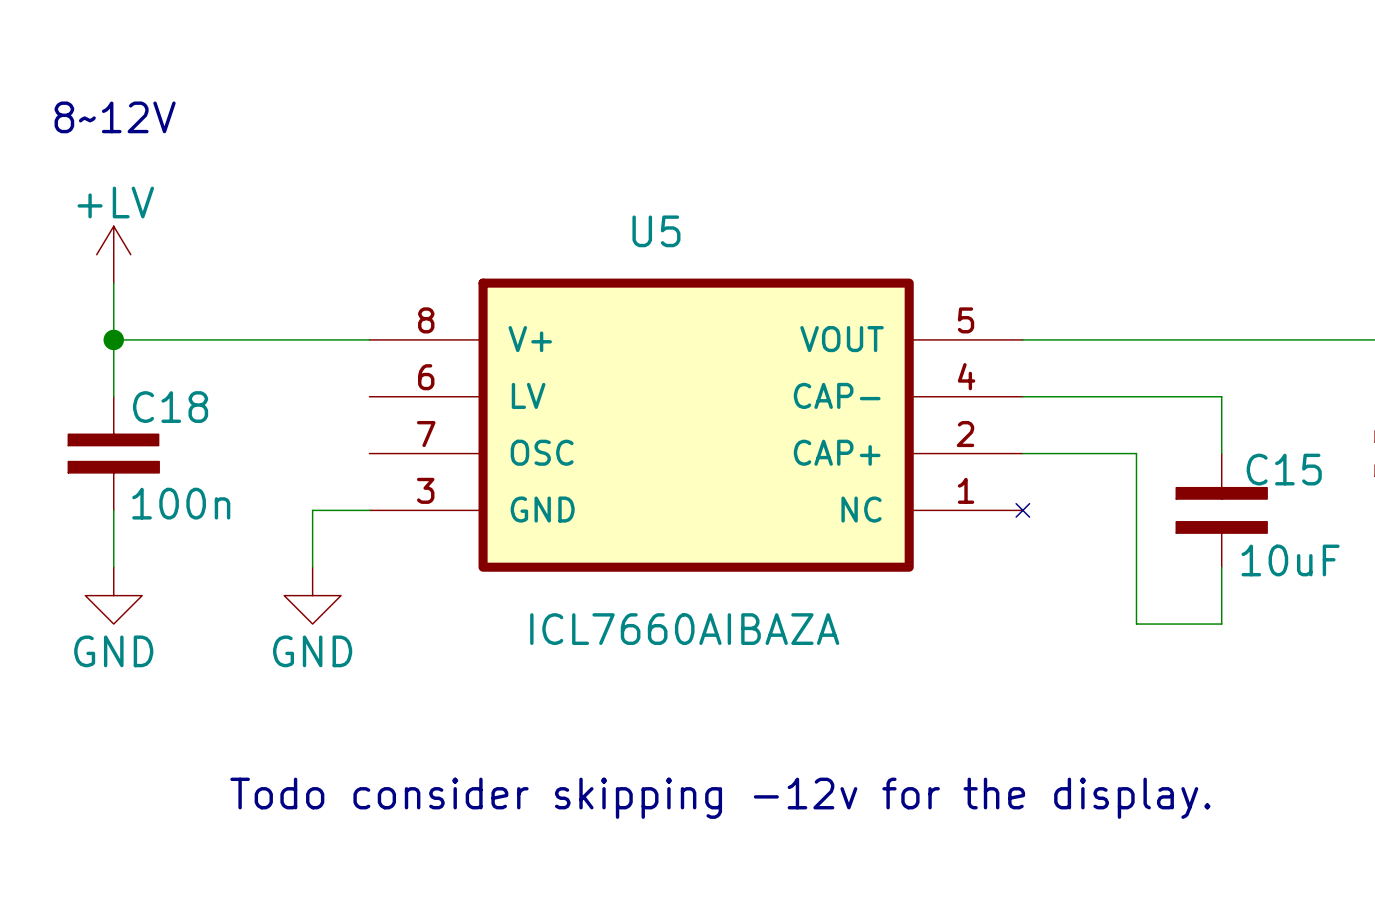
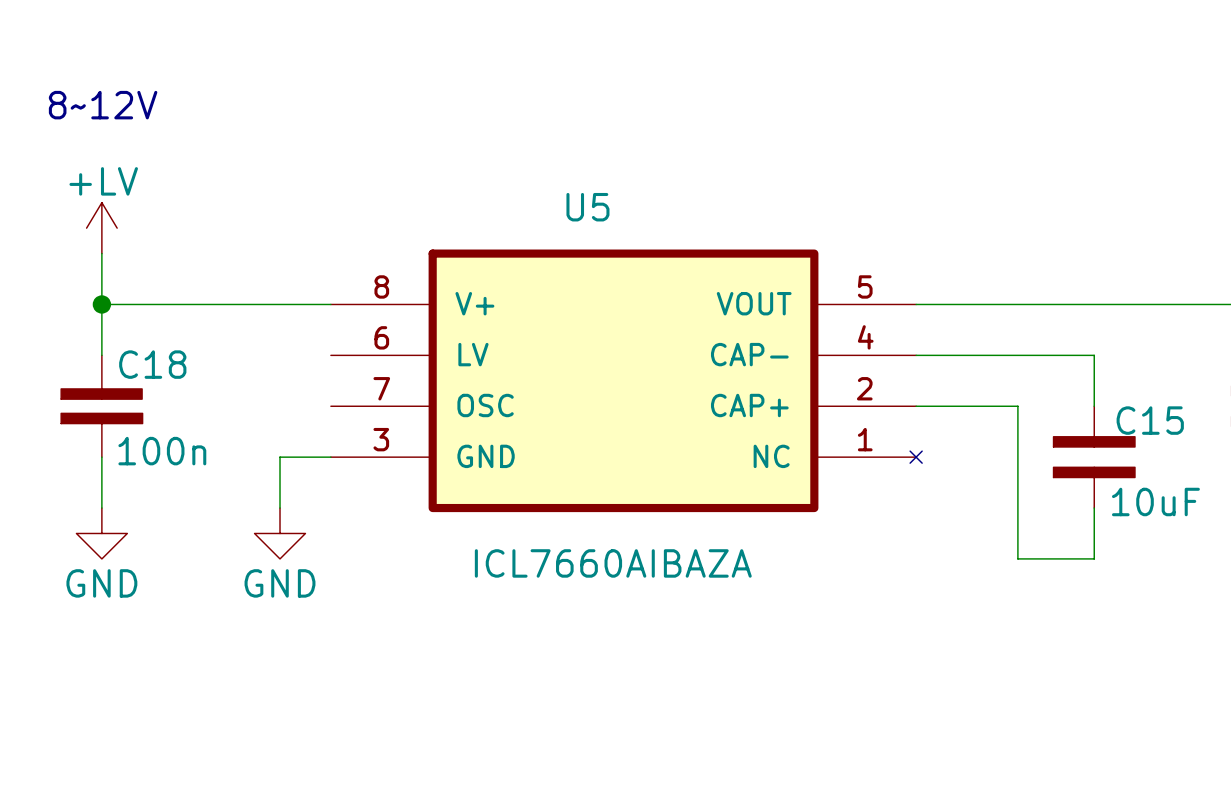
text: Todo consider skipping -12v for the display. (720, 798) -> none

